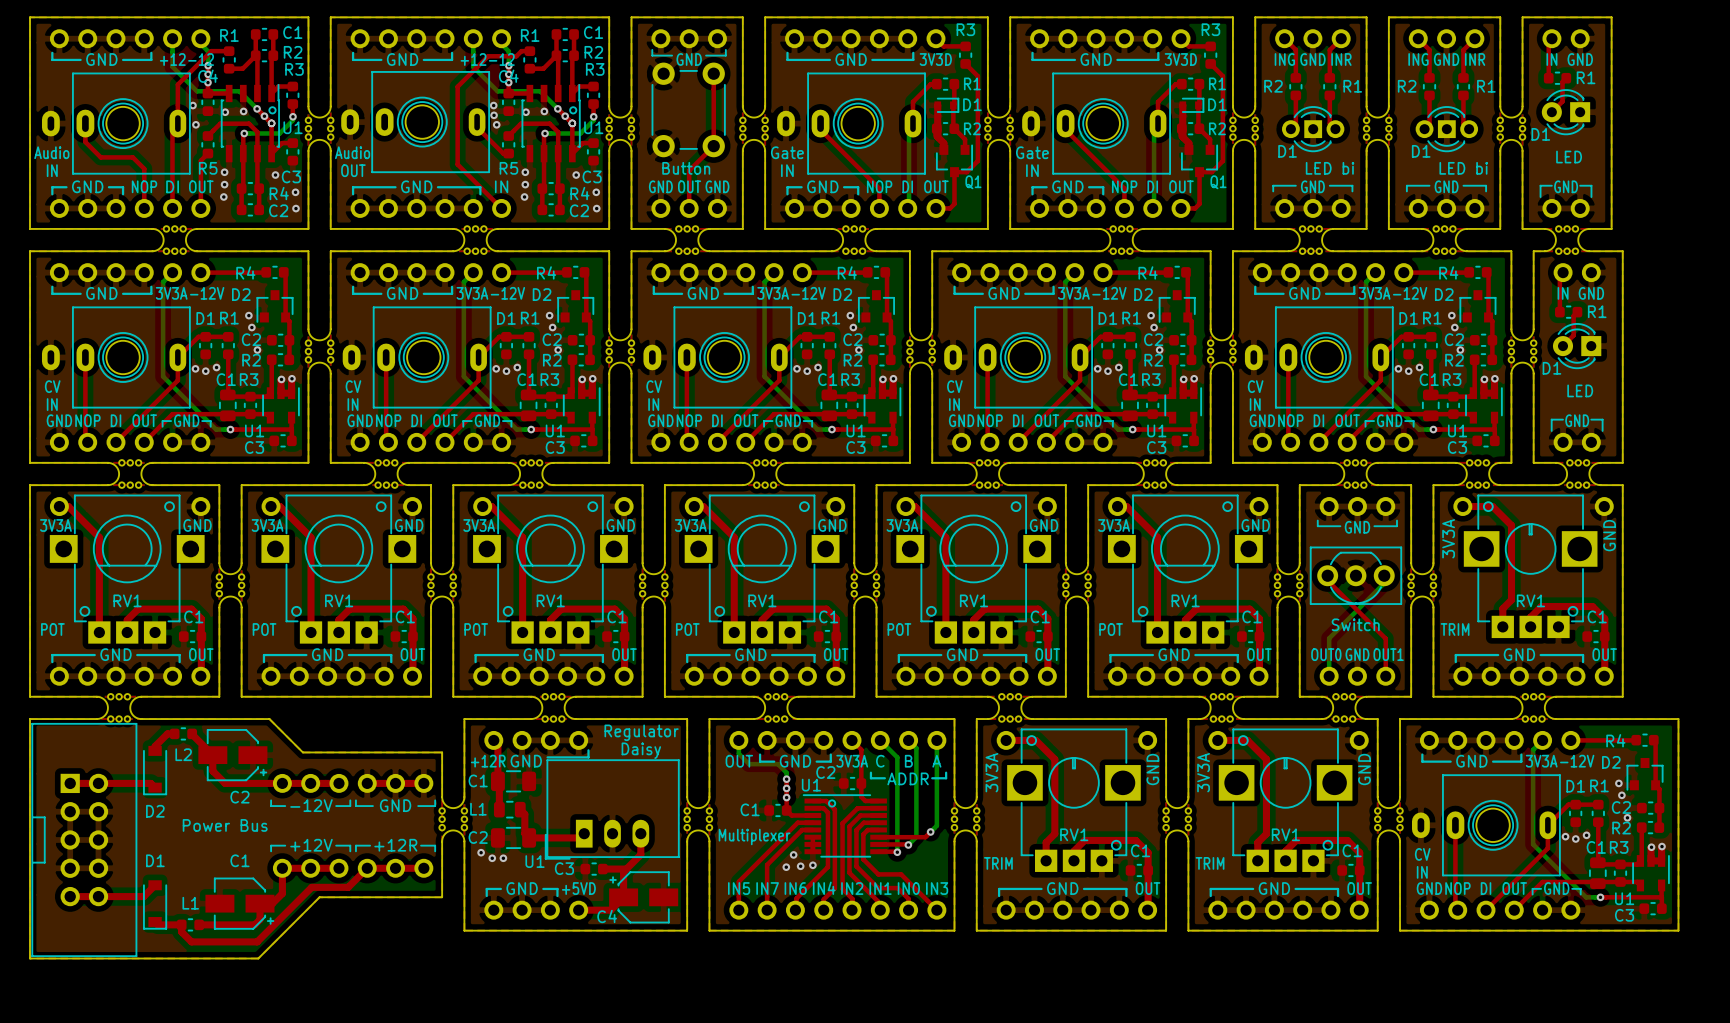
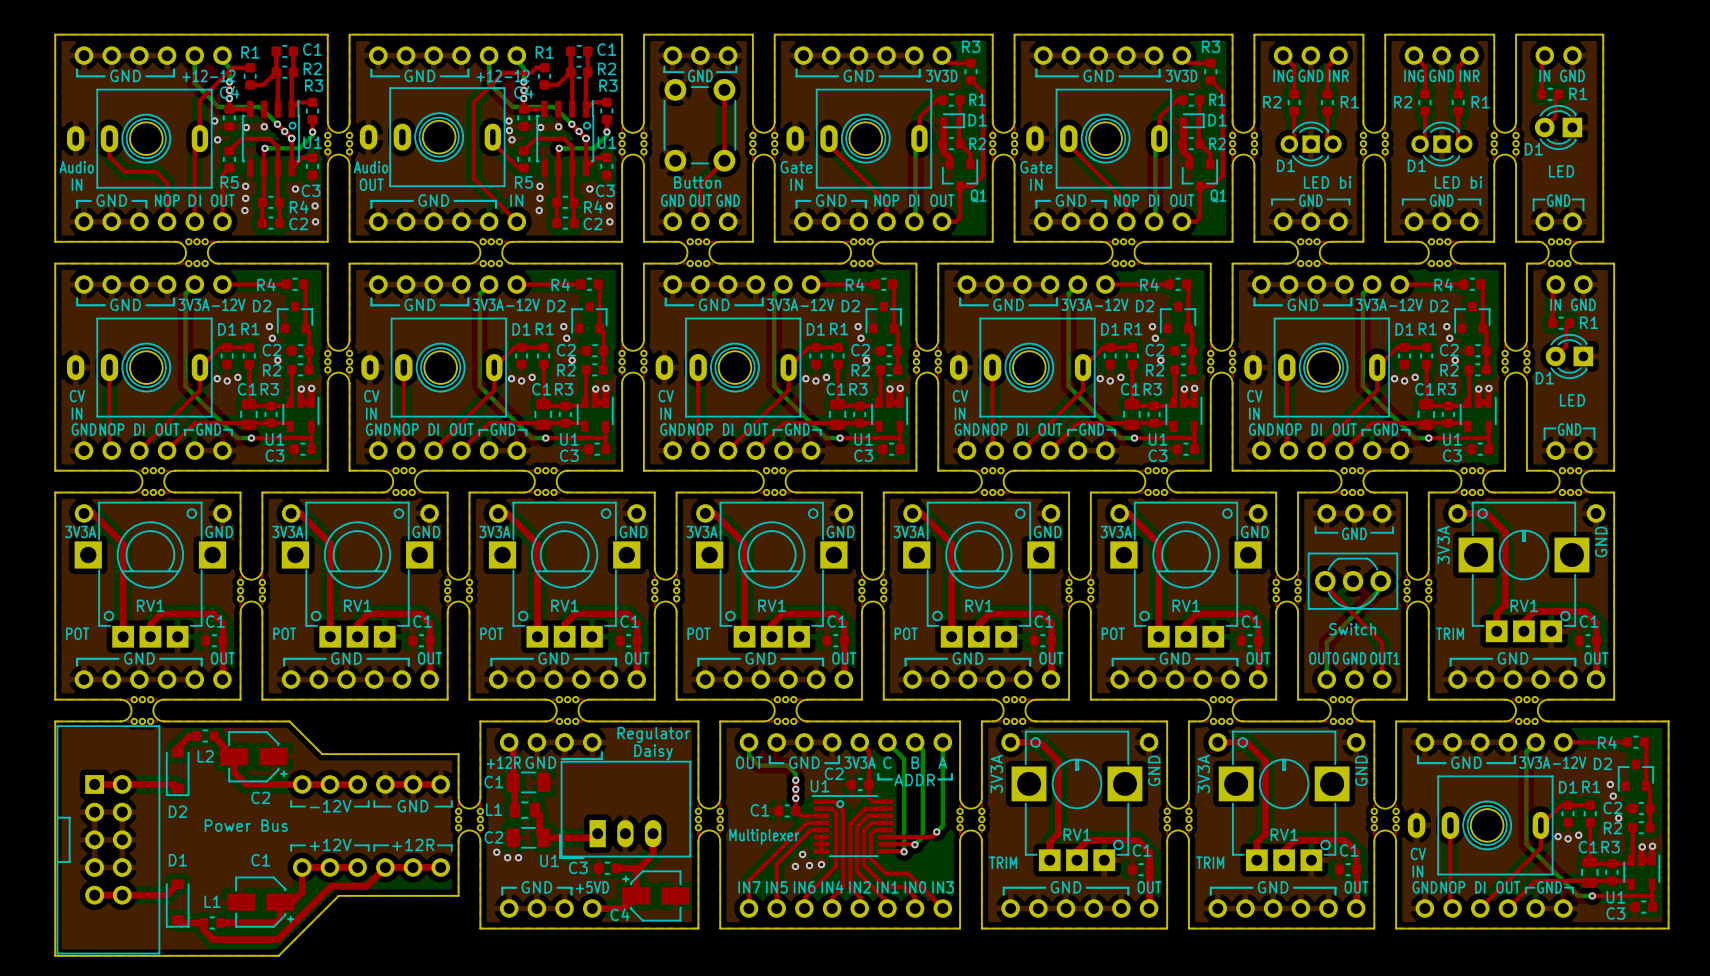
text: IN5 (739, 888) -> IN7 (749, 887)
text: IN7 (767, 888) -> IN5 (776, 887)

